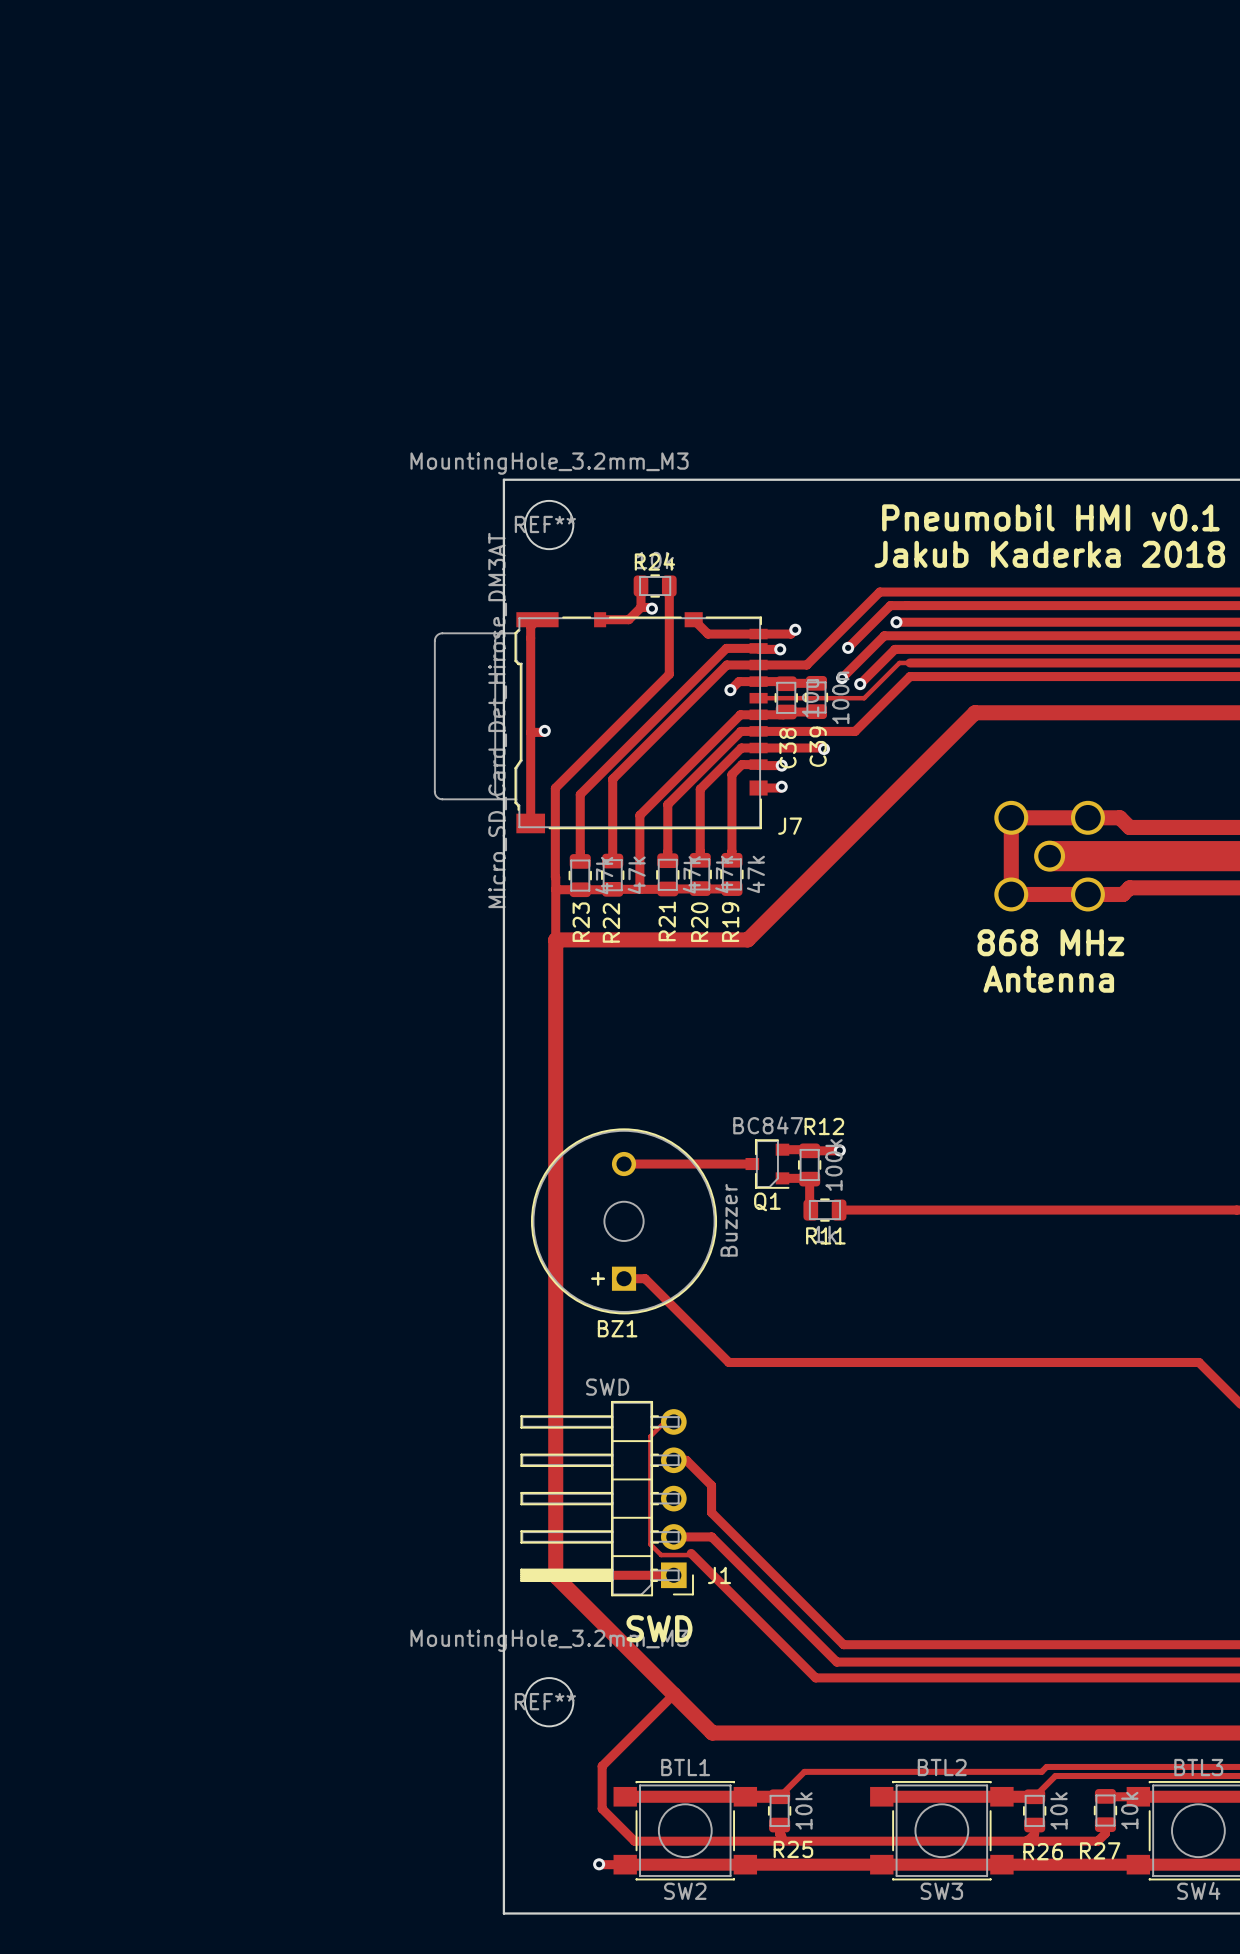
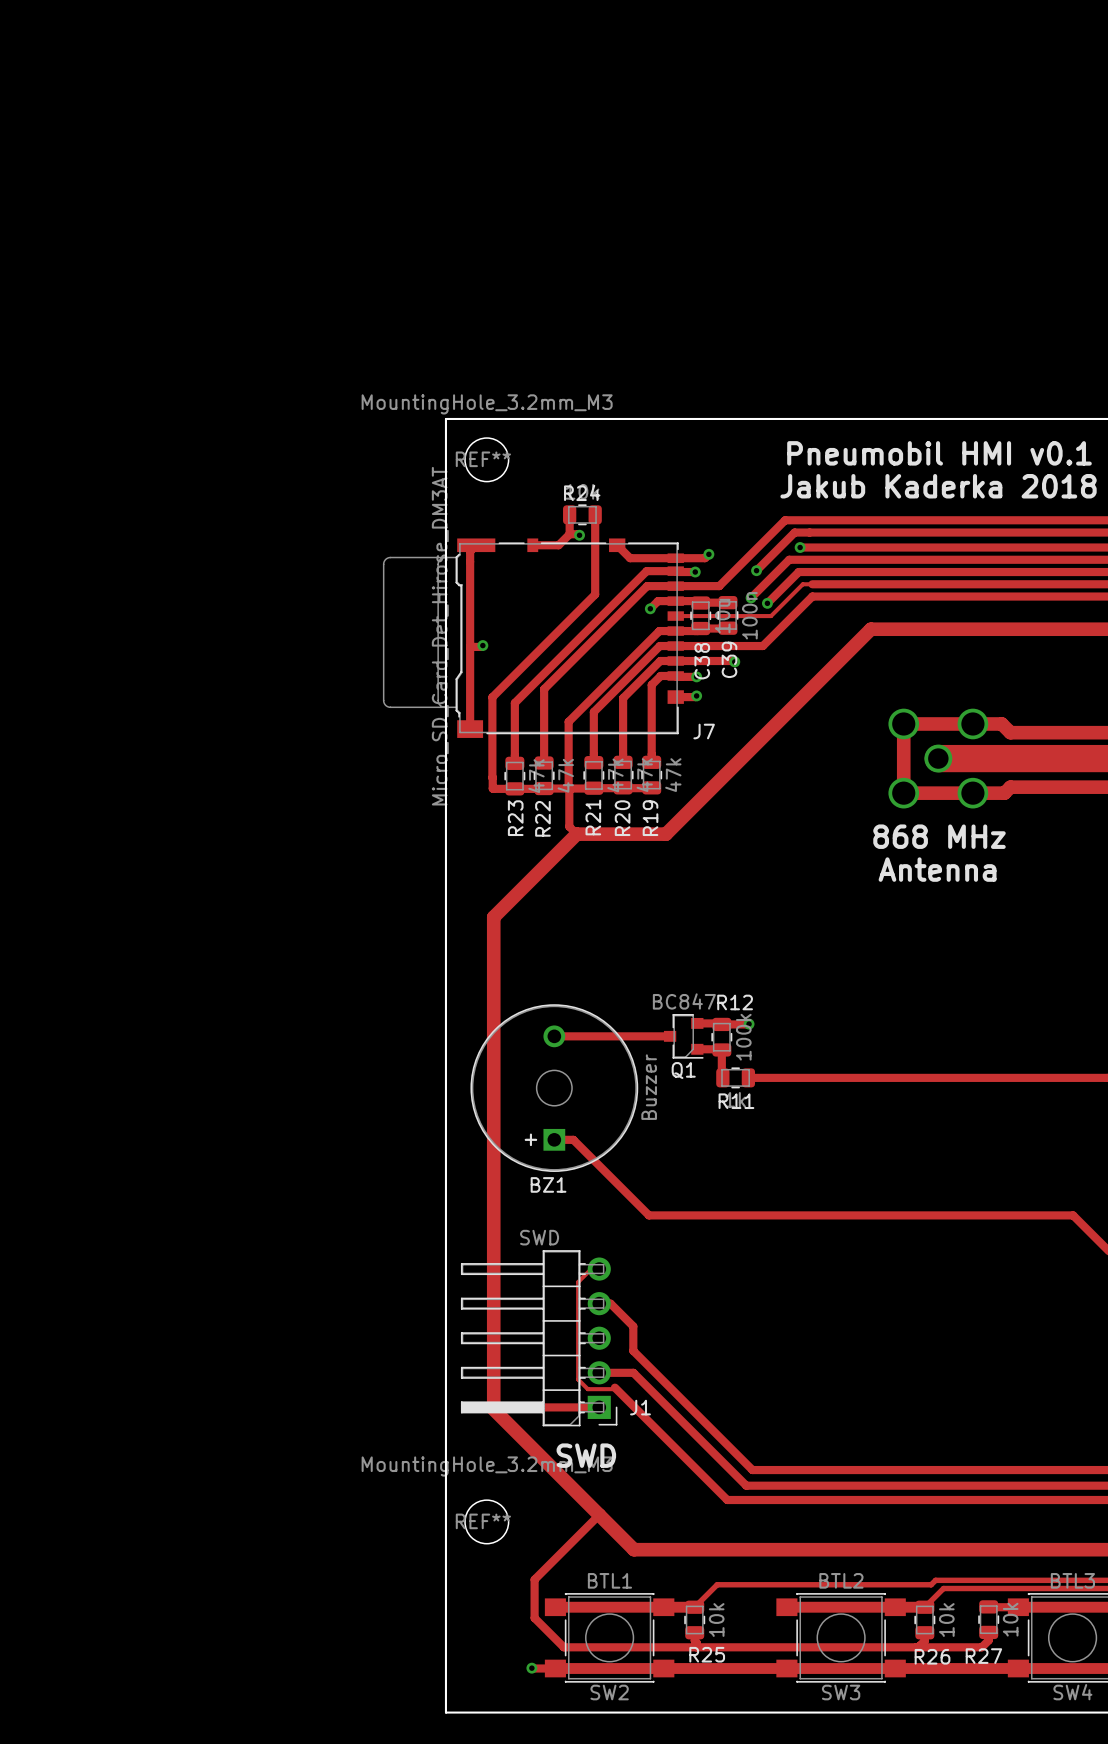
track: (555, 889) (555, 939) -> none
track: none -> (569, 788) (569, 826) (576, 834) (493, 917) (493, 1407)
track: (555, 939) (648, 939) -> none
track: (555, 939) (555, 1576) -> none

